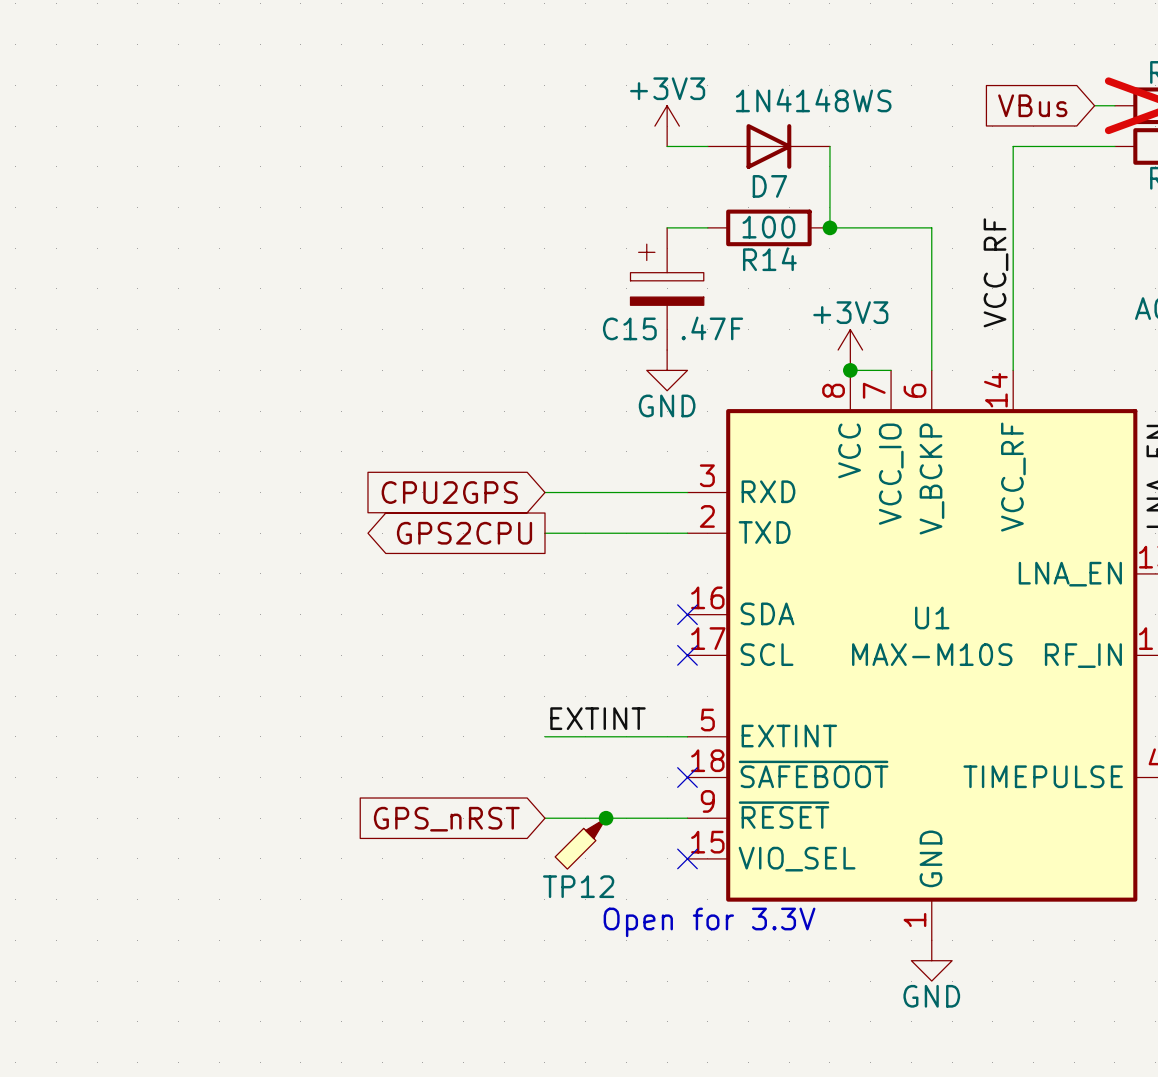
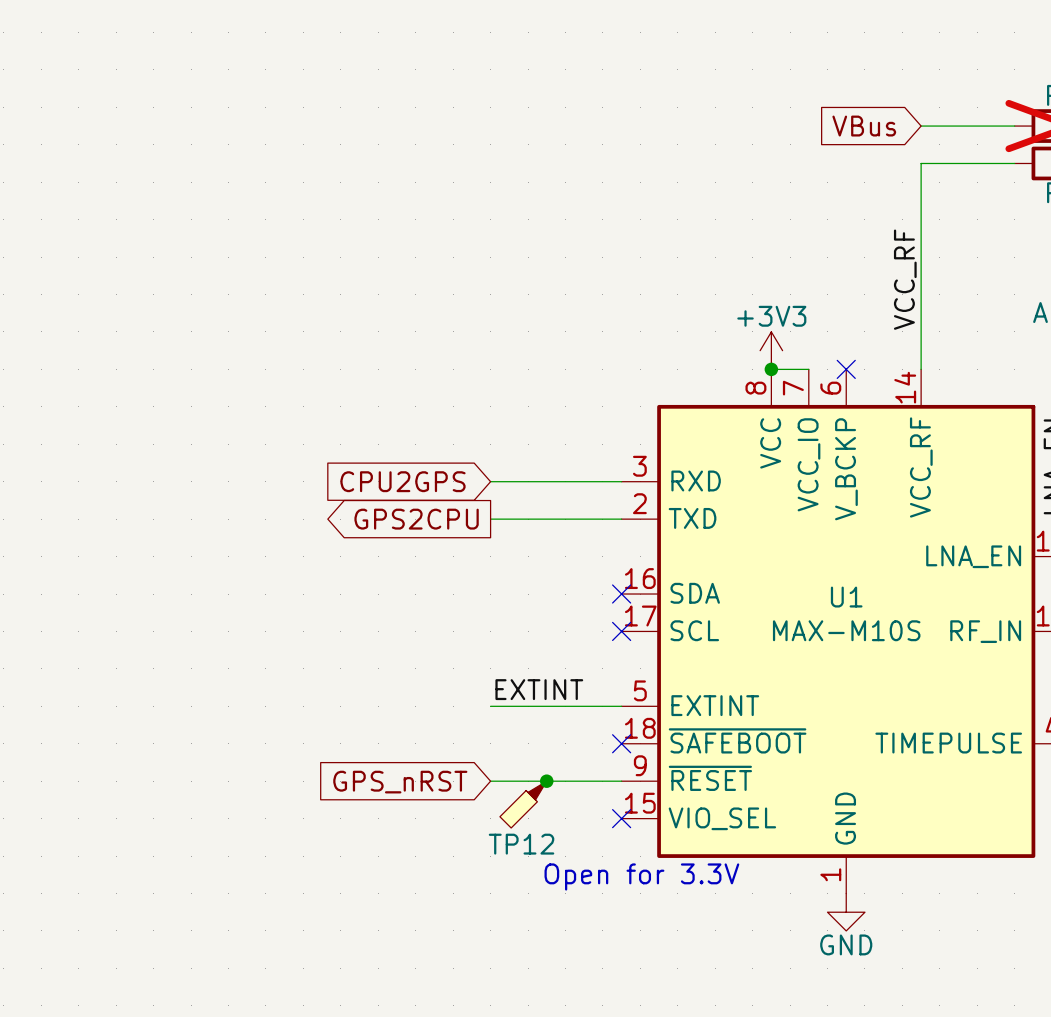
wire: none -> (921, 126) (995, 126)
global label position: VBus (1032, 105) -> VBus (864, 126)
power symbol: +3V3 (667, 126) -> none
wire: (667, 146) (707, 146) -> none
D7: 1N4148WS (768, 146) -> none
wire: (829, 146) (829, 227) (931, 227) (931, 370) -> none
wire: (667, 227) (707, 227) -> none
R14: 100 (768, 227) -> none
junction: (829, 227) -> none
C15: .47F (667, 288) -> none
power symbol: GND (667, 370) -> none
no-connect mark: none -> (846, 369)

